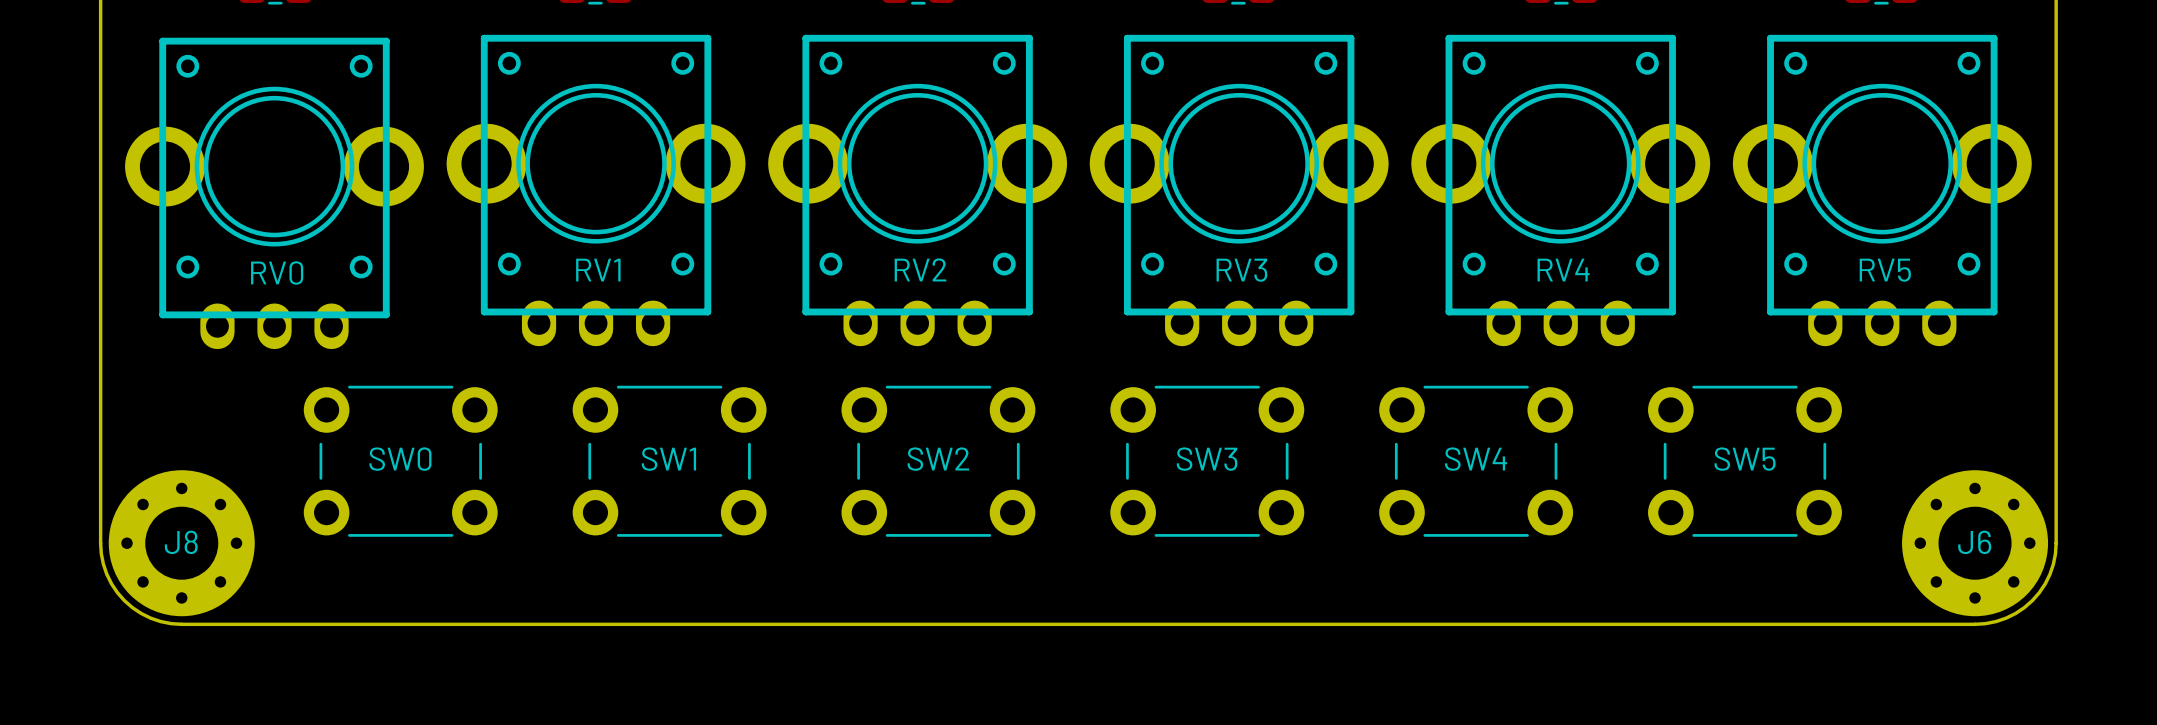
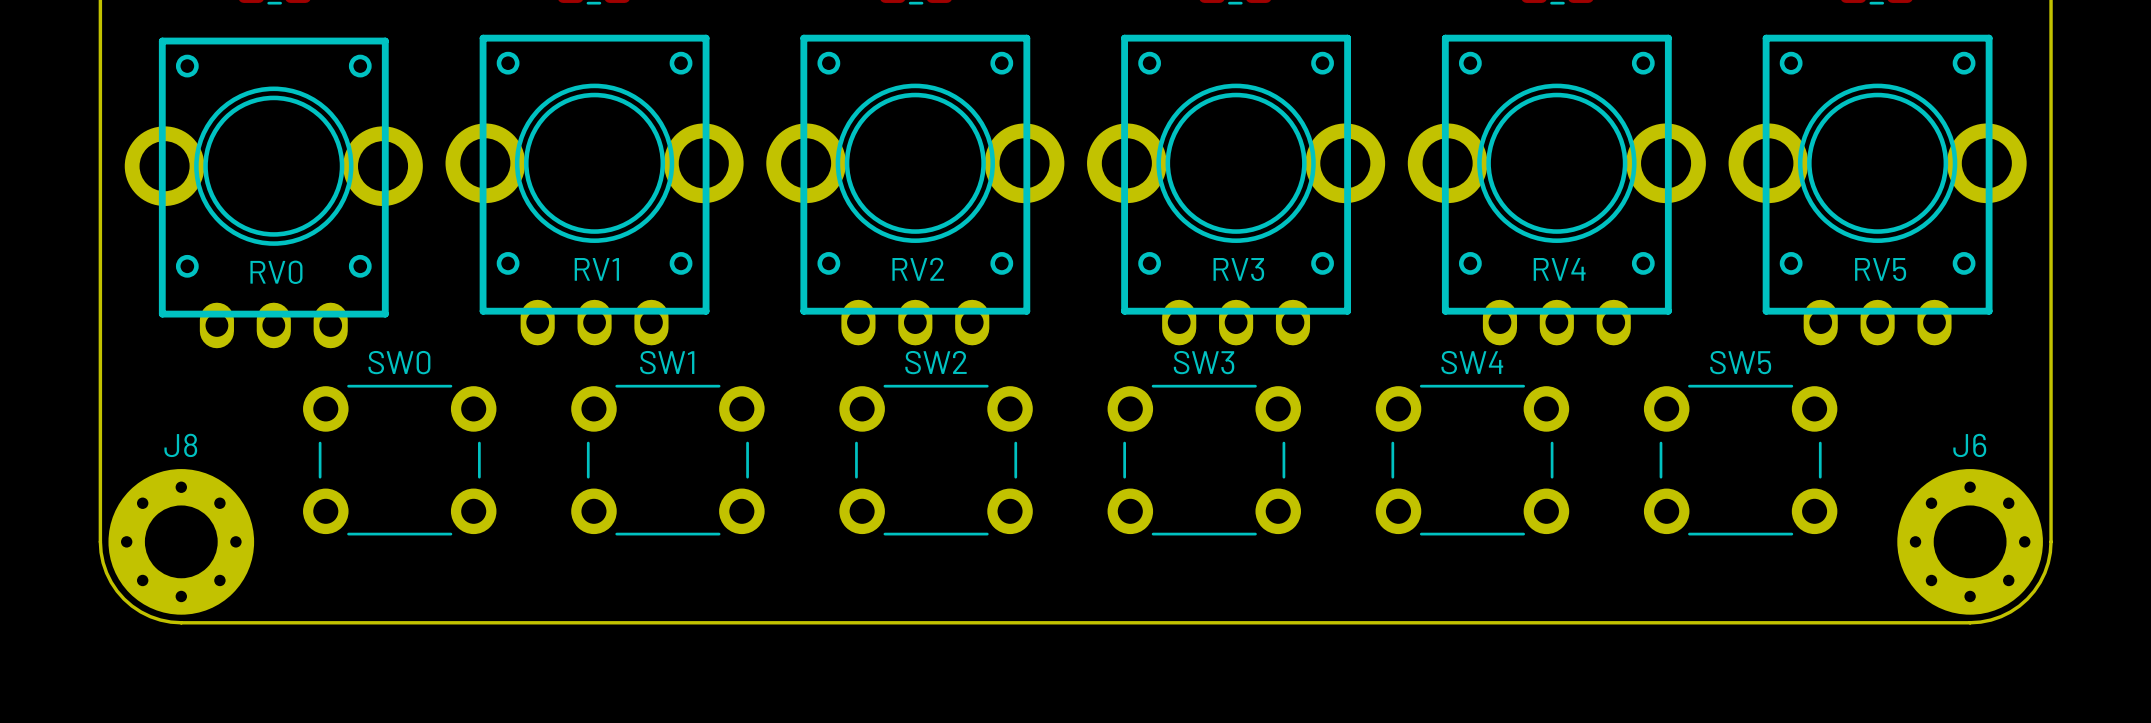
SW0 name position: SW0 (400, 459) -> SW0 (399, 362)
SW1 name position: SW1 (668, 459) -> SW1 (667, 362)
SW2 name position: SW2 (938, 459) -> SW2 (936, 362)
SW3 name position: SW3 (1207, 459) -> SW3 (1204, 362)
SW4 name position: SW4 (1475, 459) -> SW4 (1472, 362)
SW5 name position: SW5 (1745, 459) -> SW5 (1740, 362)
J8 name position: J8 (181, 542) -> J8 (180, 445)
J6 name position: J6 (1974, 542) -> J6 (1969, 445)

